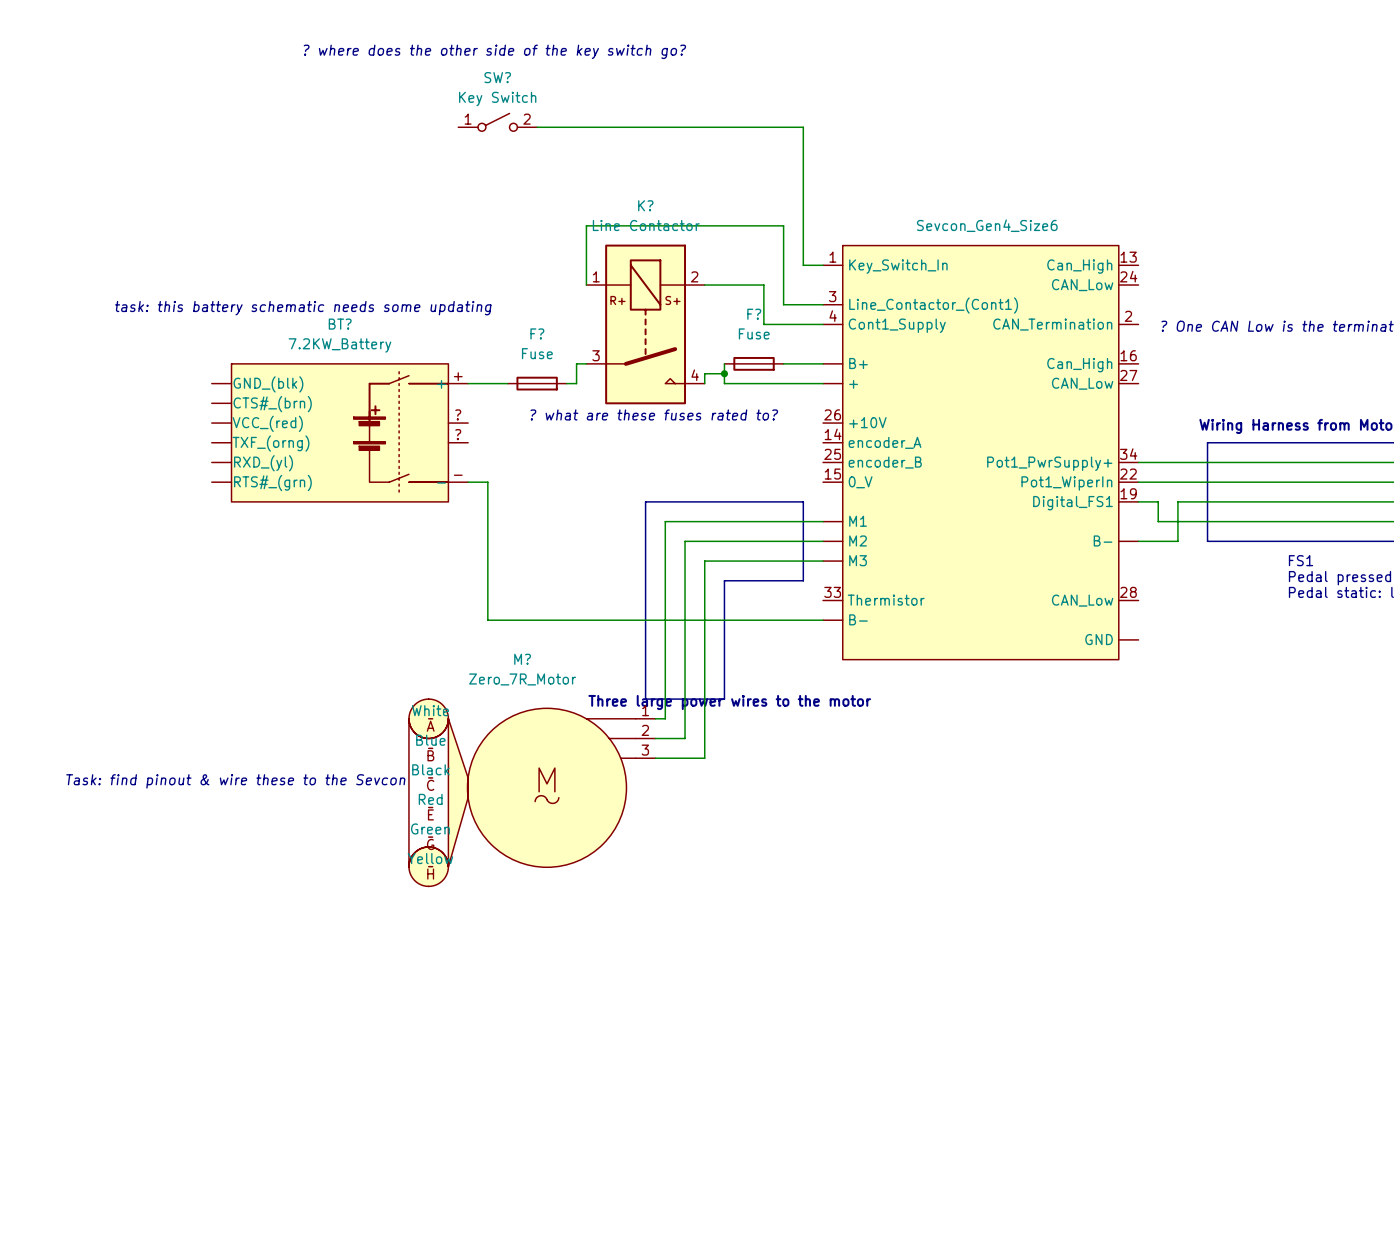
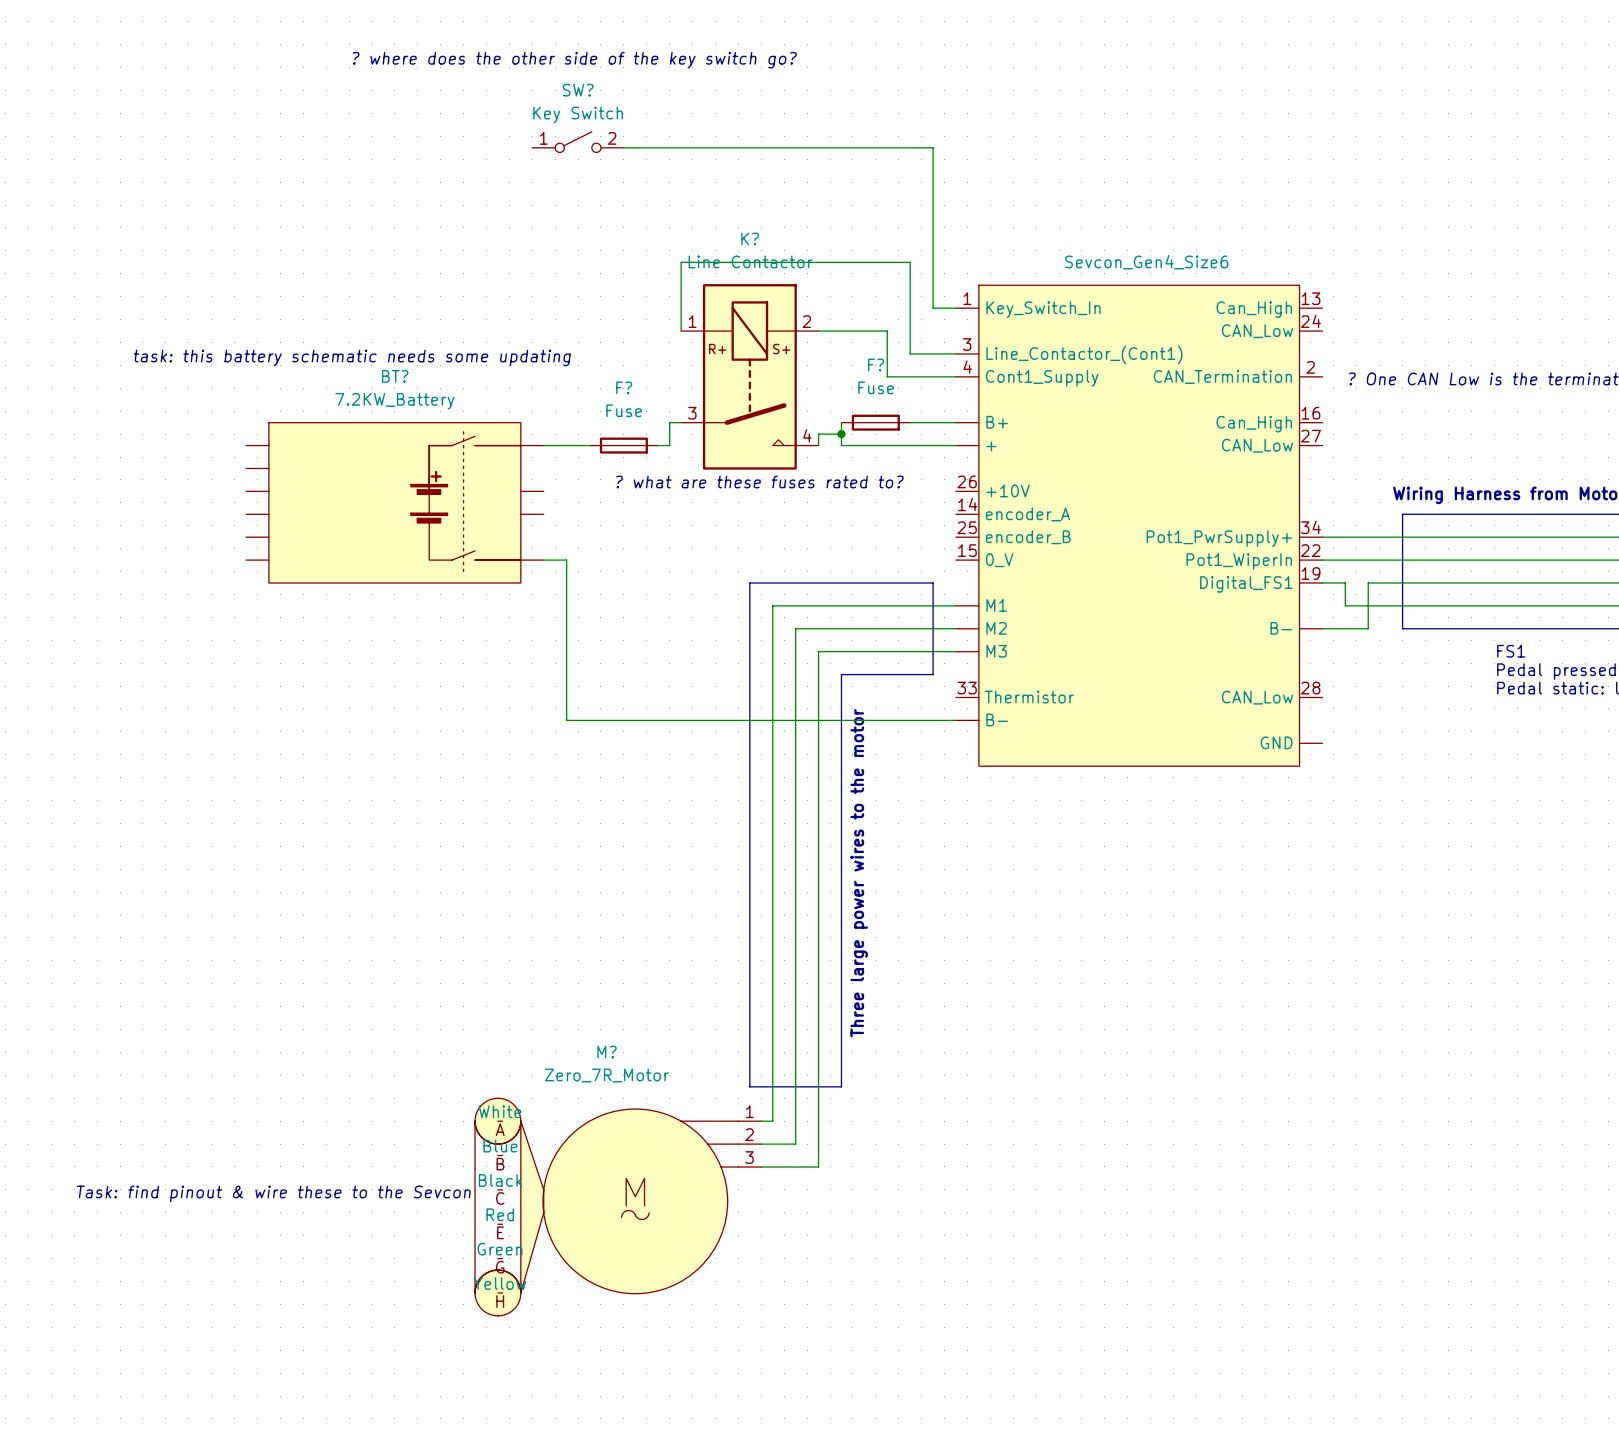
BT? symbol: [211, 363, 469, 502] -> [246, 422, 544, 583]
line: (645, 699) (724, 699) -> (749, 812) (749, 1086) (841, 1086) (841, 812)
text: Three large power wires to the motor (729, 702) -> none
wire: (655, 718) (665, 718) -> (761, 1121) (772, 1121) (772, 834)
wire: (655, 738) (685, 738) -> (761, 1144) (795, 1144) (795, 857)
text: none -> Three large power wires to the motor (859, 873)
wire: (655, 758) (704, 758) -> (761, 1166) (818, 1166) (818, 880)
text: Task: find pinout & wire these to the Sevcon (235, 781) -> none
M?: Zero_7R_Motor (532, 792) -> none
text: none -> Task: find pinout & wire these to the Sevcon (273, 1193)
M?: none -> Zero_7R_Motor (618, 1207)

